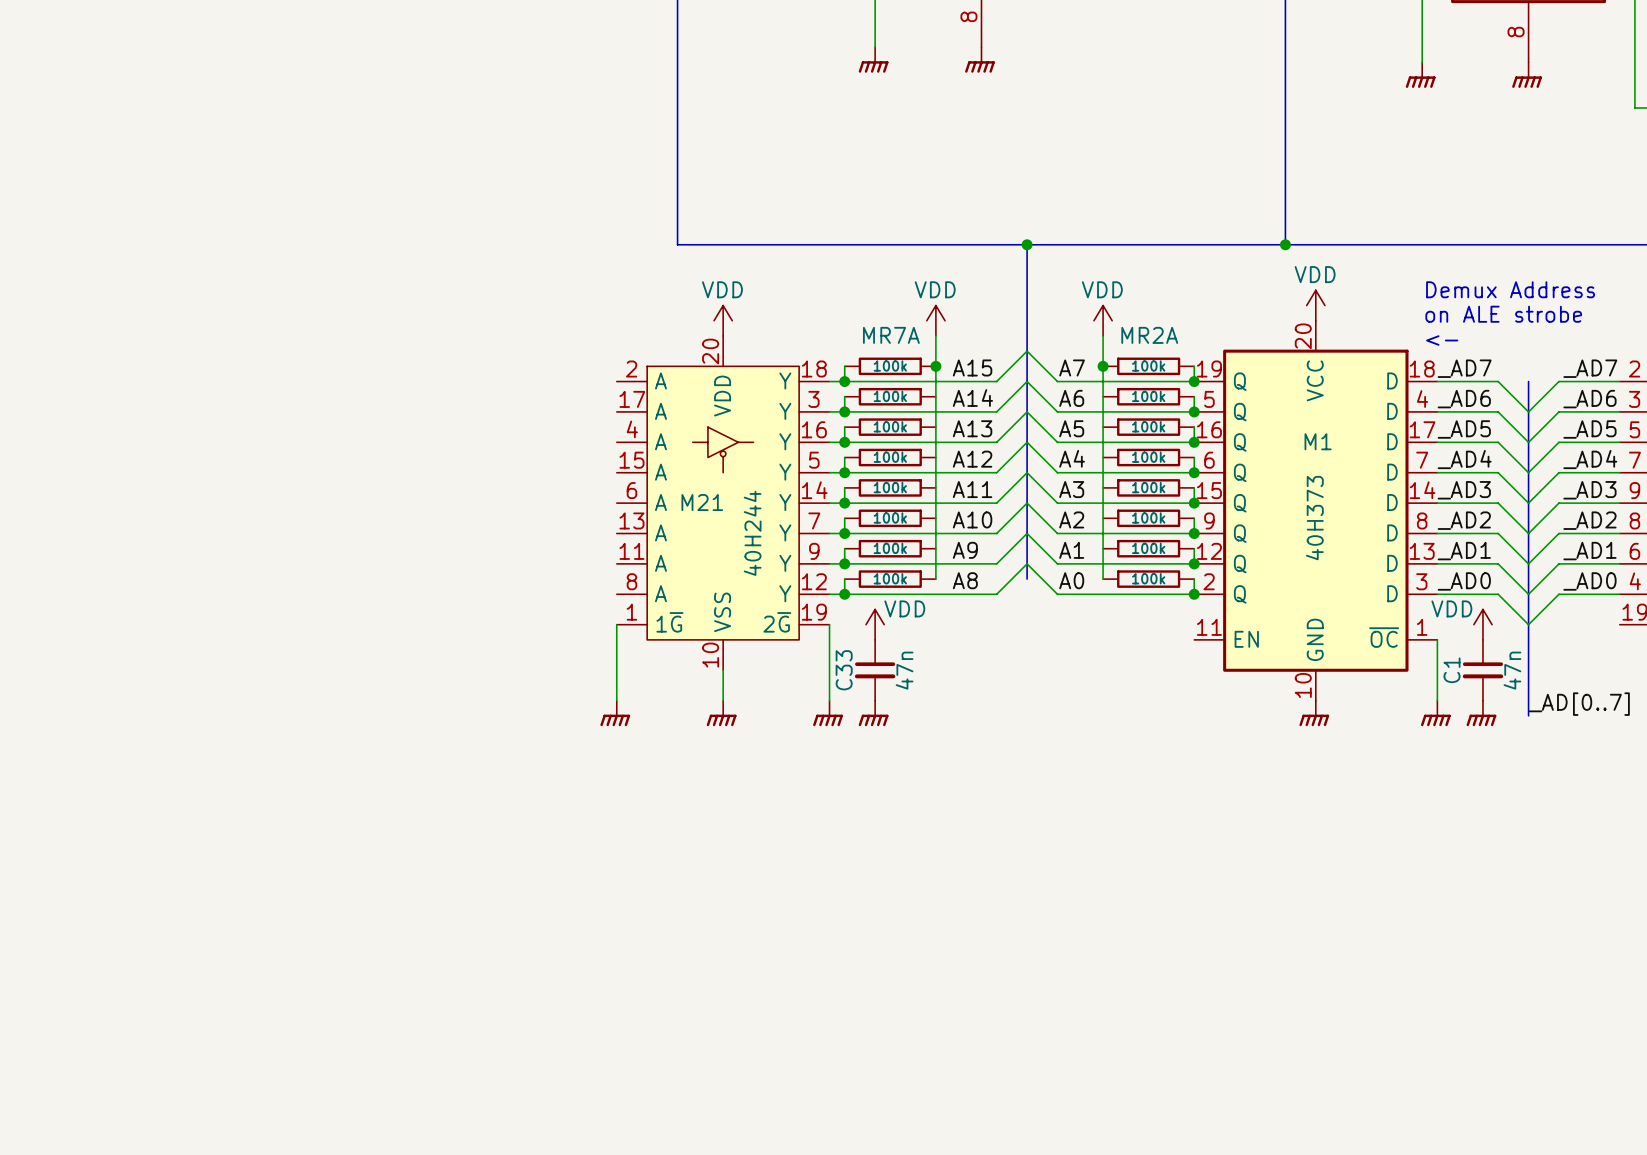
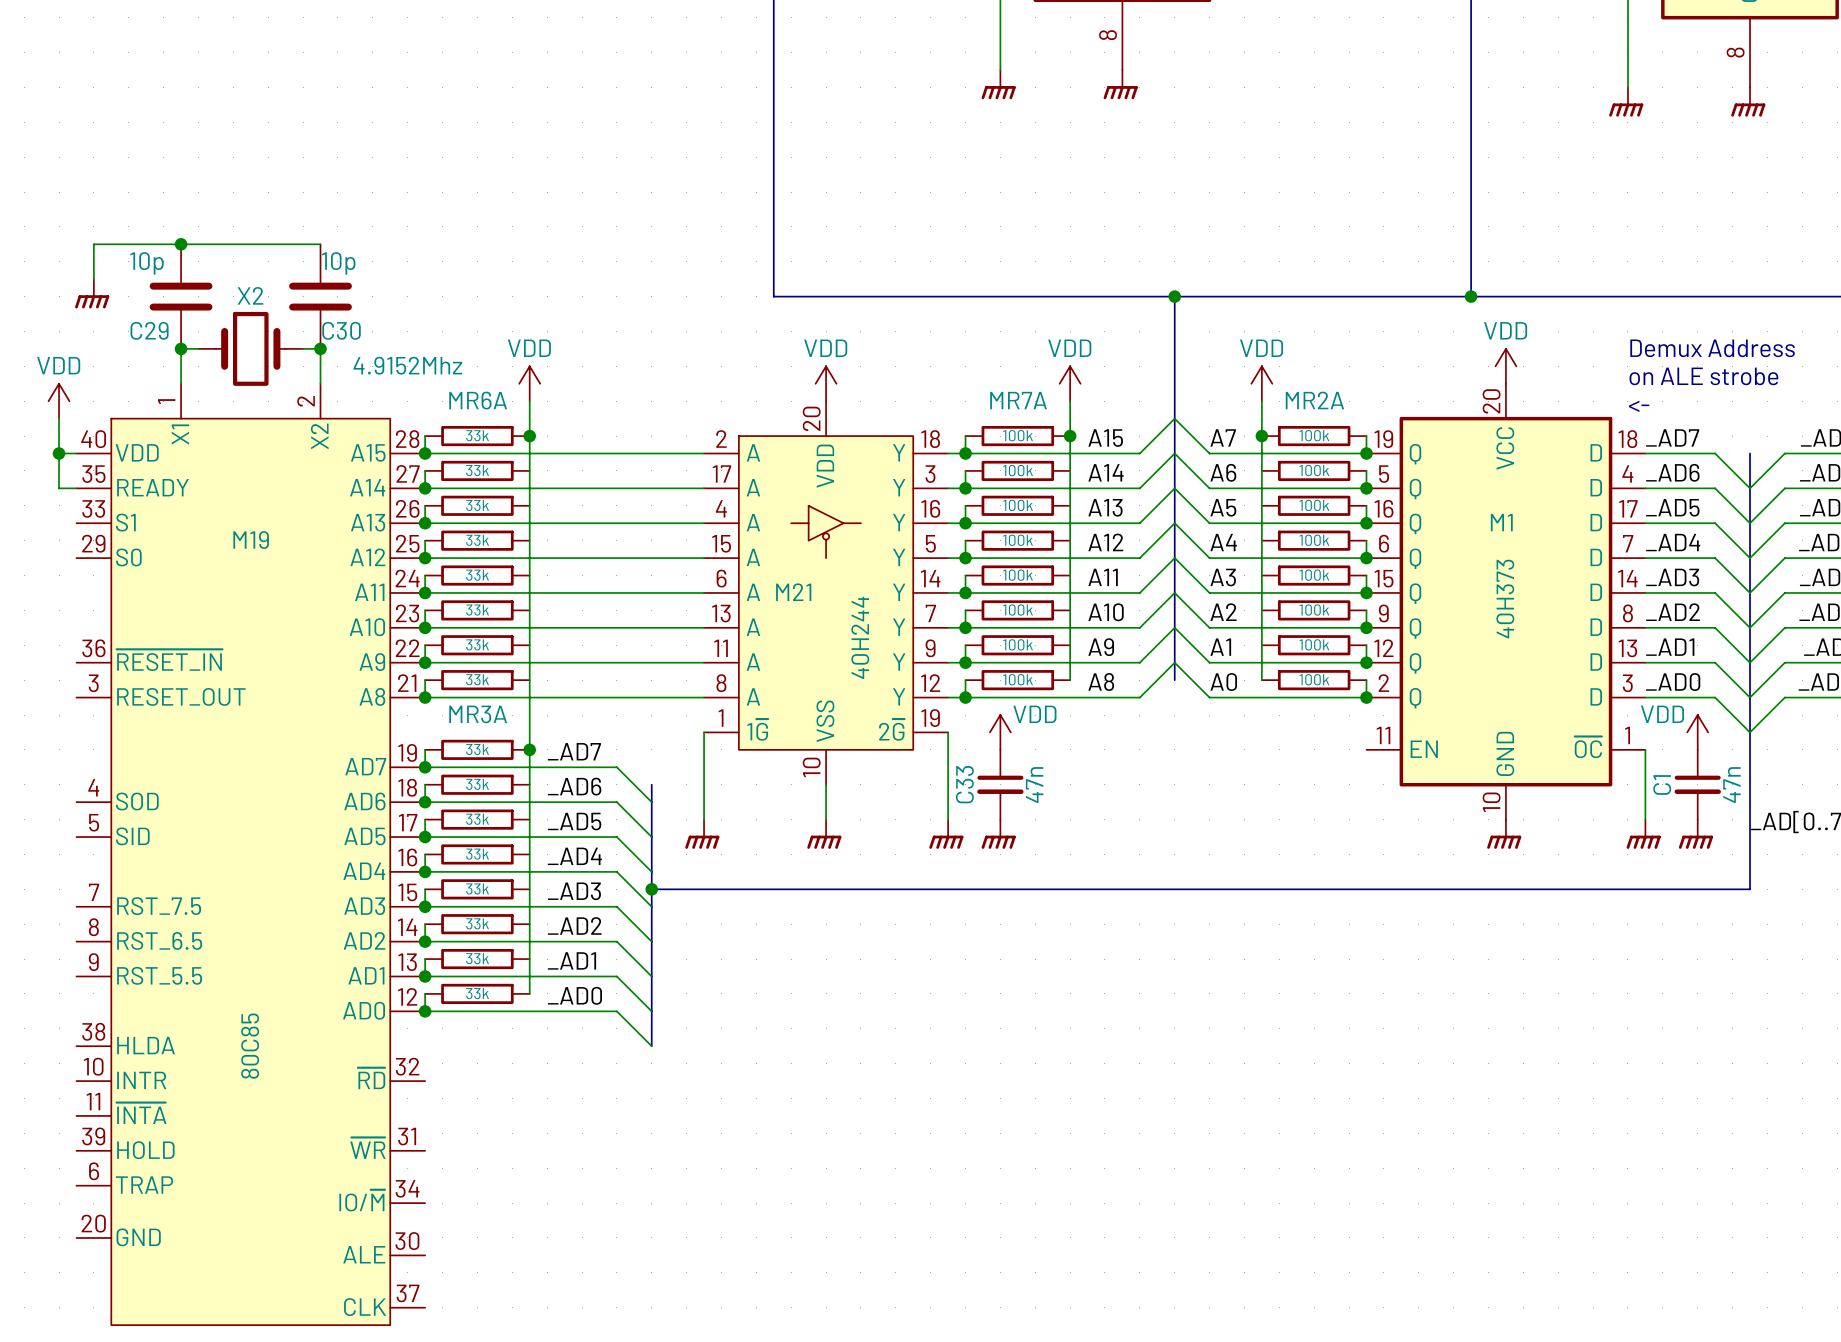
junction: none -> (181, 244)
wire: none -> (320, 244) (93, 244) (93, 279)
power symbol: none -> (92, 293)
C29: none -> 10p (181, 296)
C30: none -> 10p (320, 296)
junction: none -> (181, 348)
wire: none -> (198, 348) (181, 348) (181, 383)
X2: none -> 4.9152Mhz (250, 348)
wire: none -> (303, 348) (320, 348) (320, 383)
junction: none -> (320, 348)
power symbol: none -> VDD (529, 383)
power symbol: none -> VDD (59, 401)
wire: none -> (529, 401) (529, 993)
wire: none -> (59, 418) (59, 488) (76, 488)
wire: none -> (425, 436) (425, 453) (704, 453)
MR6A: none -> 33k (477, 436)
junction: none -> (529, 436)
wire: none -> (59, 453) (76, 453)
junction: none -> (59, 453)
junction: none -> (425, 453)
wire: none -> (425, 470) (425, 488) (704, 488)
part: none -> 33k (477, 470)
junction: none -> (425, 488)
wire: none -> (425, 505) (425, 523) (704, 523)
part: none -> 33k (477, 505)
junction: none -> (425, 523)
wire: none -> (425, 540) (425, 558) (704, 558)
part: none -> 33k (477, 540)
junction: none -> (425, 558)
wire: none -> (425, 575) (425, 592) (704, 592)
part: none -> 33k (477, 575)
junction: none -> (425, 592)
wire: none -> (425, 610) (425, 627) (704, 627)
part: none -> 33k (477, 610)
junction: none -> (425, 627)
wire: none -> (425, 645) (425, 662) (704, 662)
part: none -> 33k (477, 645)
junction: none -> (425, 662)
wire: none -> (425, 680) (425, 697) (704, 697)
part: none -> 33k (477, 680)
junction: none -> (425, 697)
wire: none -> (425, 749) (425, 767) (616, 767) (651, 802)
MR3A: none -> 33k (477, 749)
junction: none -> (529, 749)
label: none -> _AD7 (574, 751)
junction: none -> (425, 767)
wire: none -> (425, 784) (425, 802) (616, 802) (651, 837)
part: none -> 33k (477, 784)
bus: none -> (651, 784) (651, 1046)
label: none -> _AD6 (574, 786)
junction: none -> (425, 802)
wire: none -> (425, 819) (425, 837) (616, 837) (651, 871)
part: none -> 33k (477, 819)
label: none -> _AD5 (574, 821)
junction: none -> (425, 837)
bus: none -> (1750, 837) (1750, 889) (651, 889)
M19: none -> 80C85 (250, 854)
wire: none -> (425, 854) (425, 871) (616, 871) (651, 906)
part: none -> 33k (477, 854)
label: none -> _AD4 (574, 856)
junction: none -> (425, 871)
wire: none -> (425, 889) (425, 906) (616, 906) (651, 941)
part: none -> 33k (477, 889)
junction: none -> (651, 889)
label: none -> _AD3 (574, 891)
junction: none -> (425, 906)
wire: none -> (425, 924) (425, 941) (616, 941) (651, 976)
part: none -> 33k (477, 924)
label: none -> _AD2 (574, 925)
junction: none -> (425, 941)
wire: none -> (425, 959) (425, 976) (616, 976) (651, 1011)
part: none -> 33k (477, 959)
label: none -> _AD1 (571, 960)
junction: none -> (425, 976)
wire: none -> (425, 993) (425, 1011) (616, 1011) (651, 1046)
part: none -> 33k (477, 993)
label: none -> _AD0 (574, 995)
junction: none -> (425, 1011)

